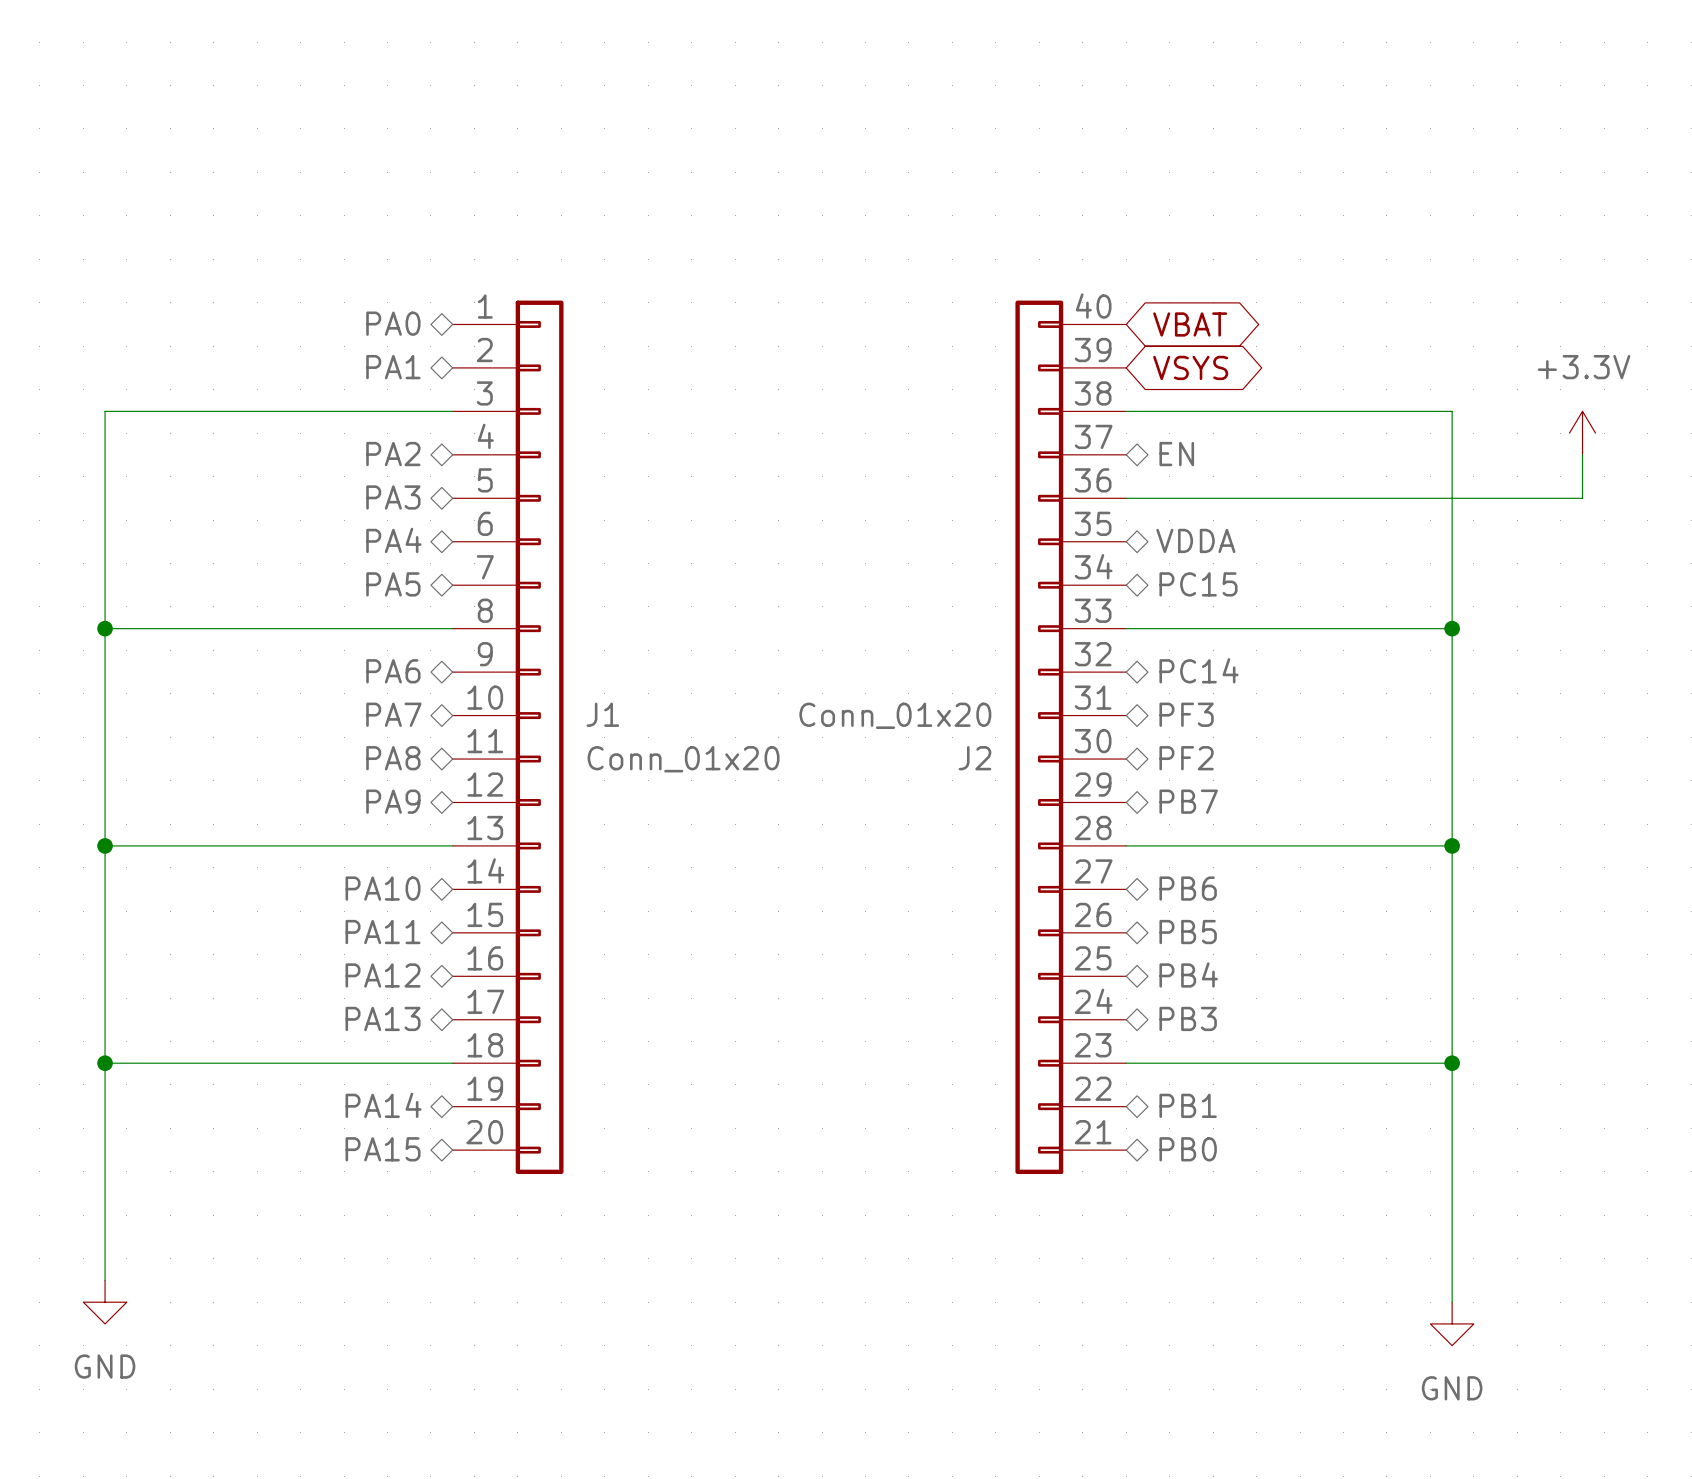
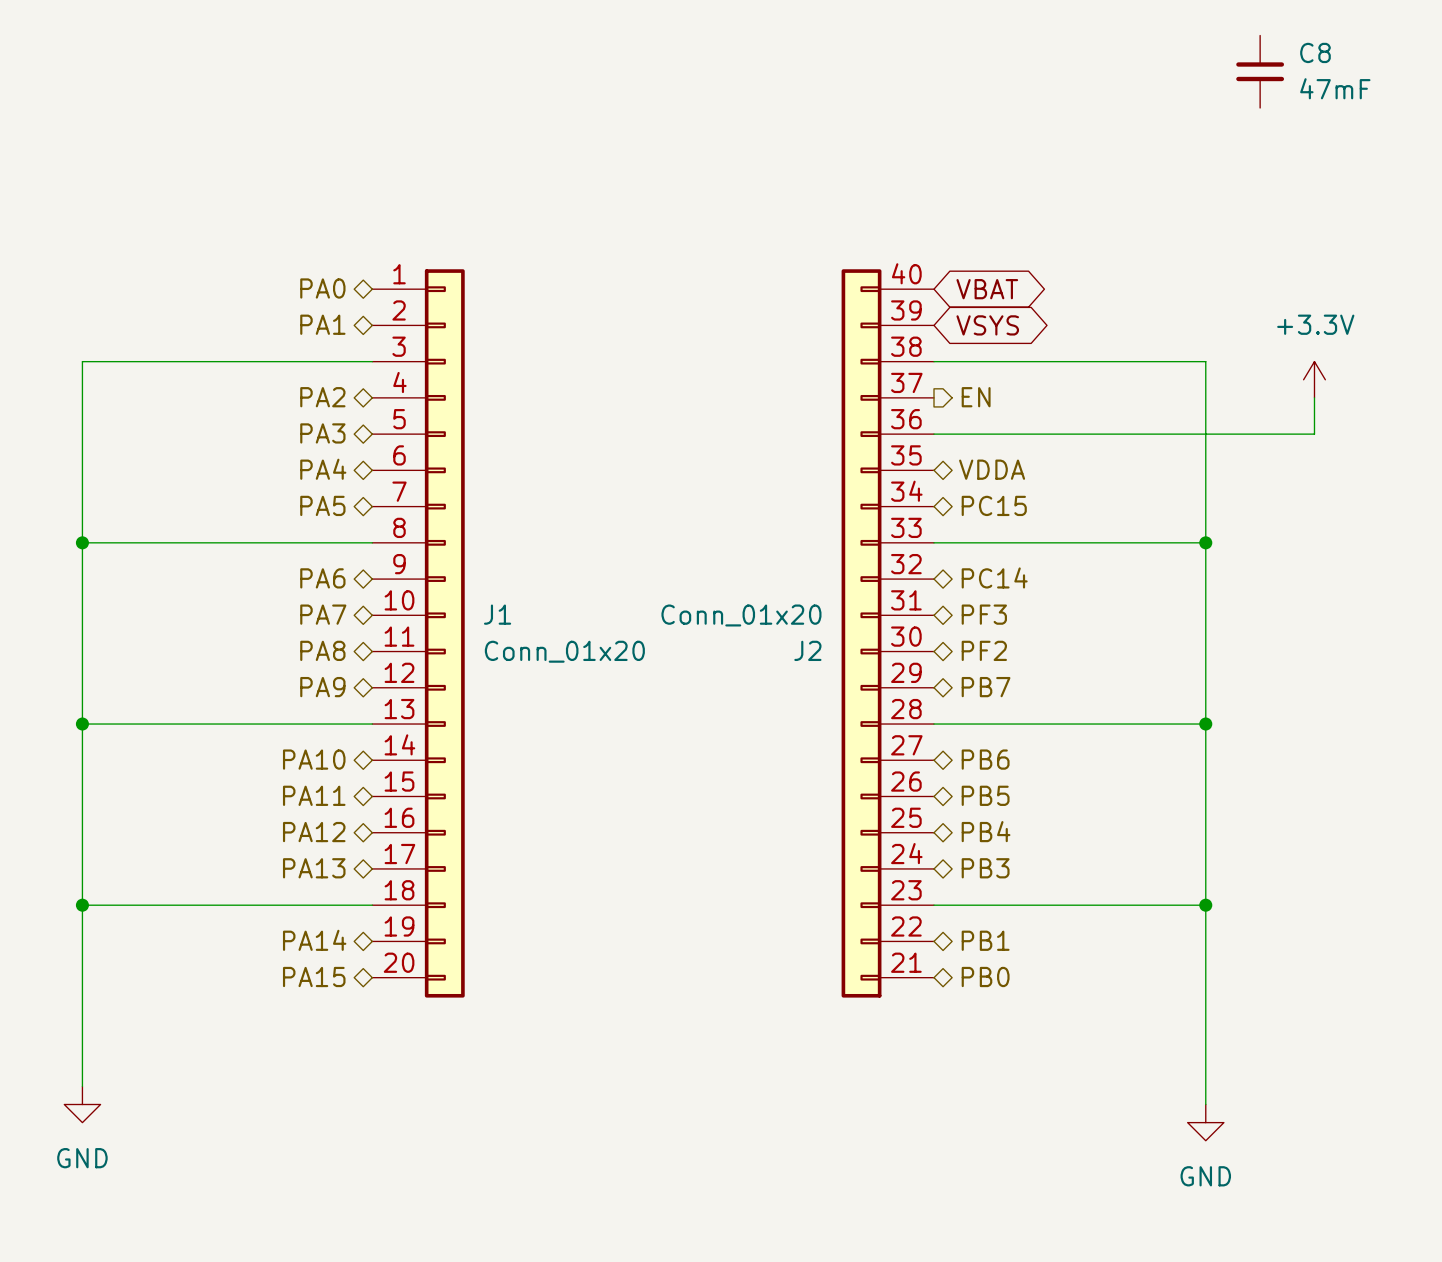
C8: none -> 47mF (1260, 71)
hierarchical label shape: bidirectional (1176, 454) -> output (976, 397)

